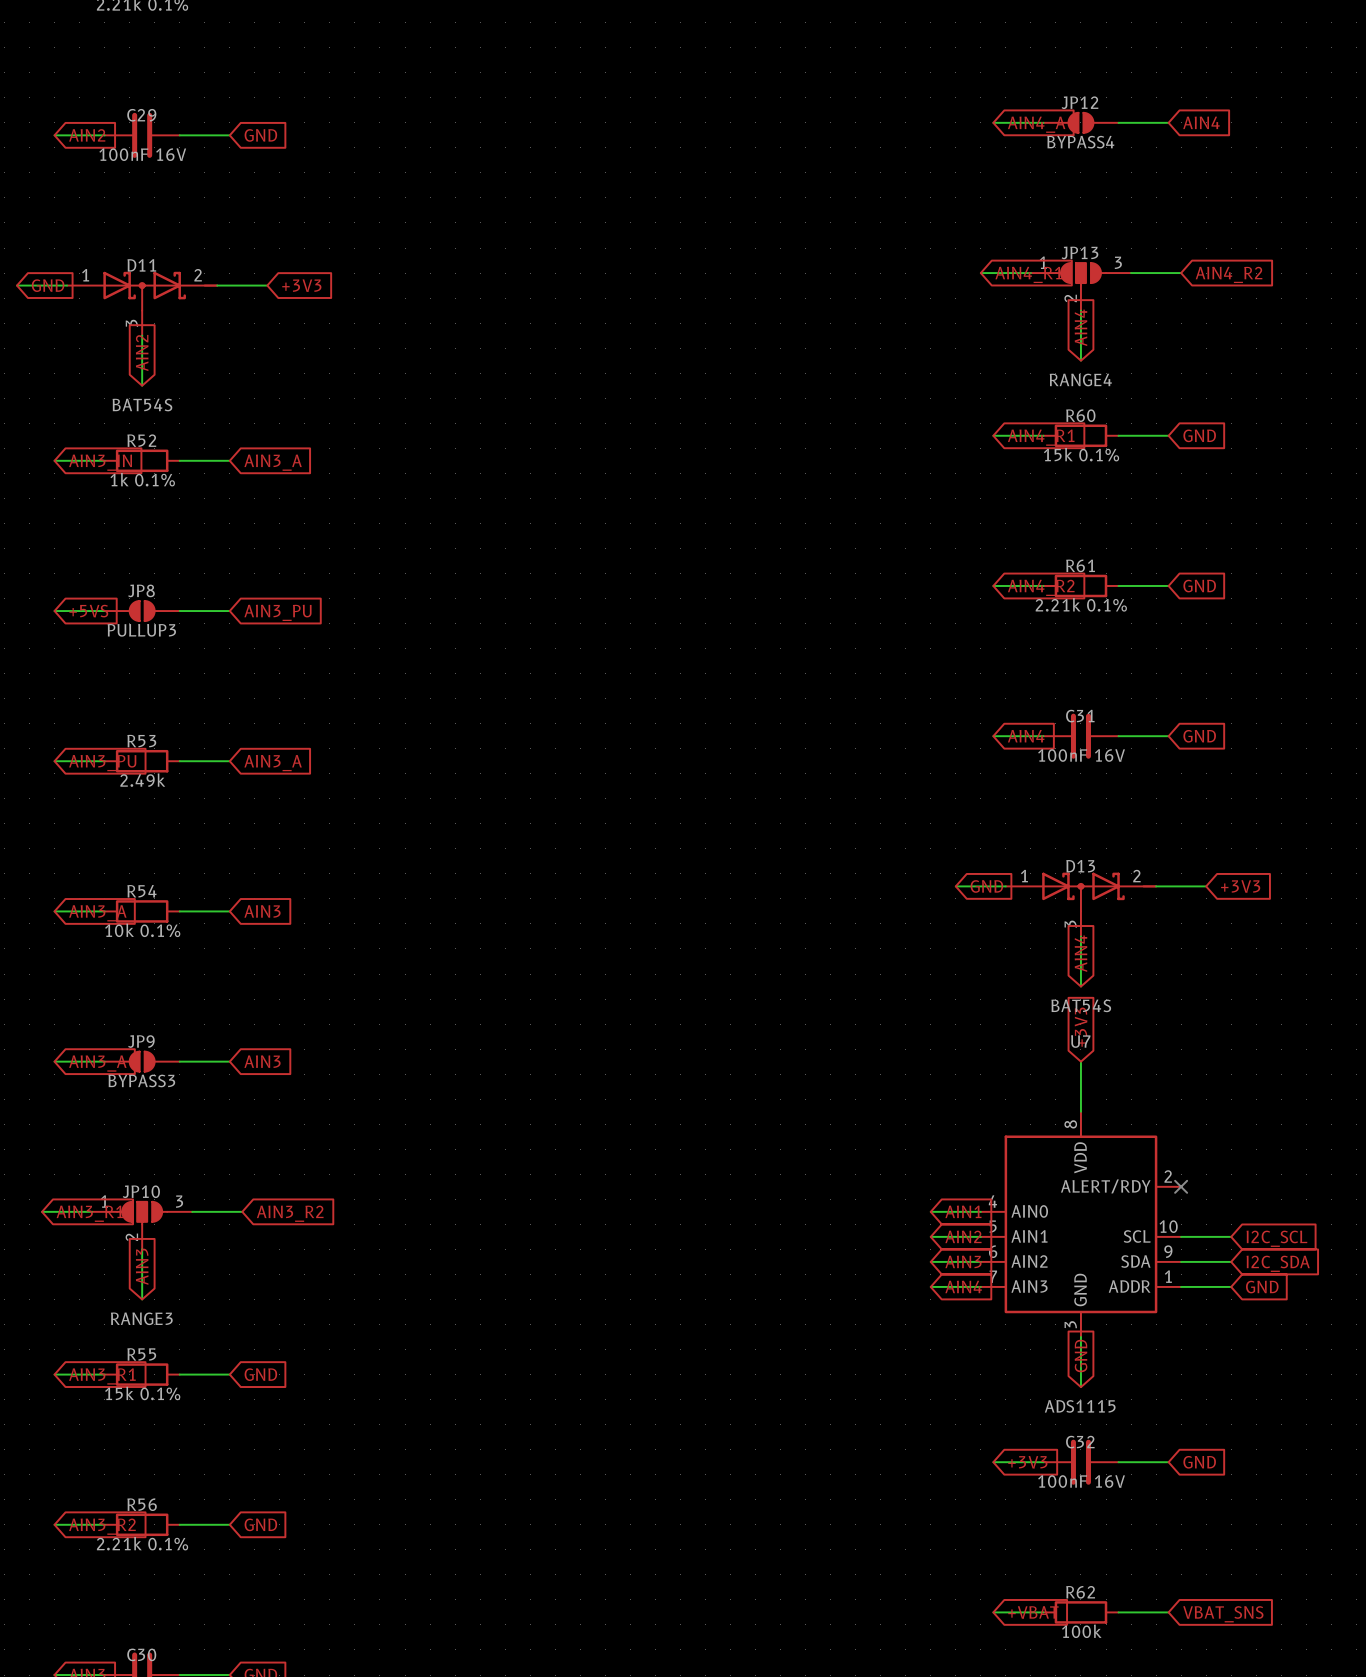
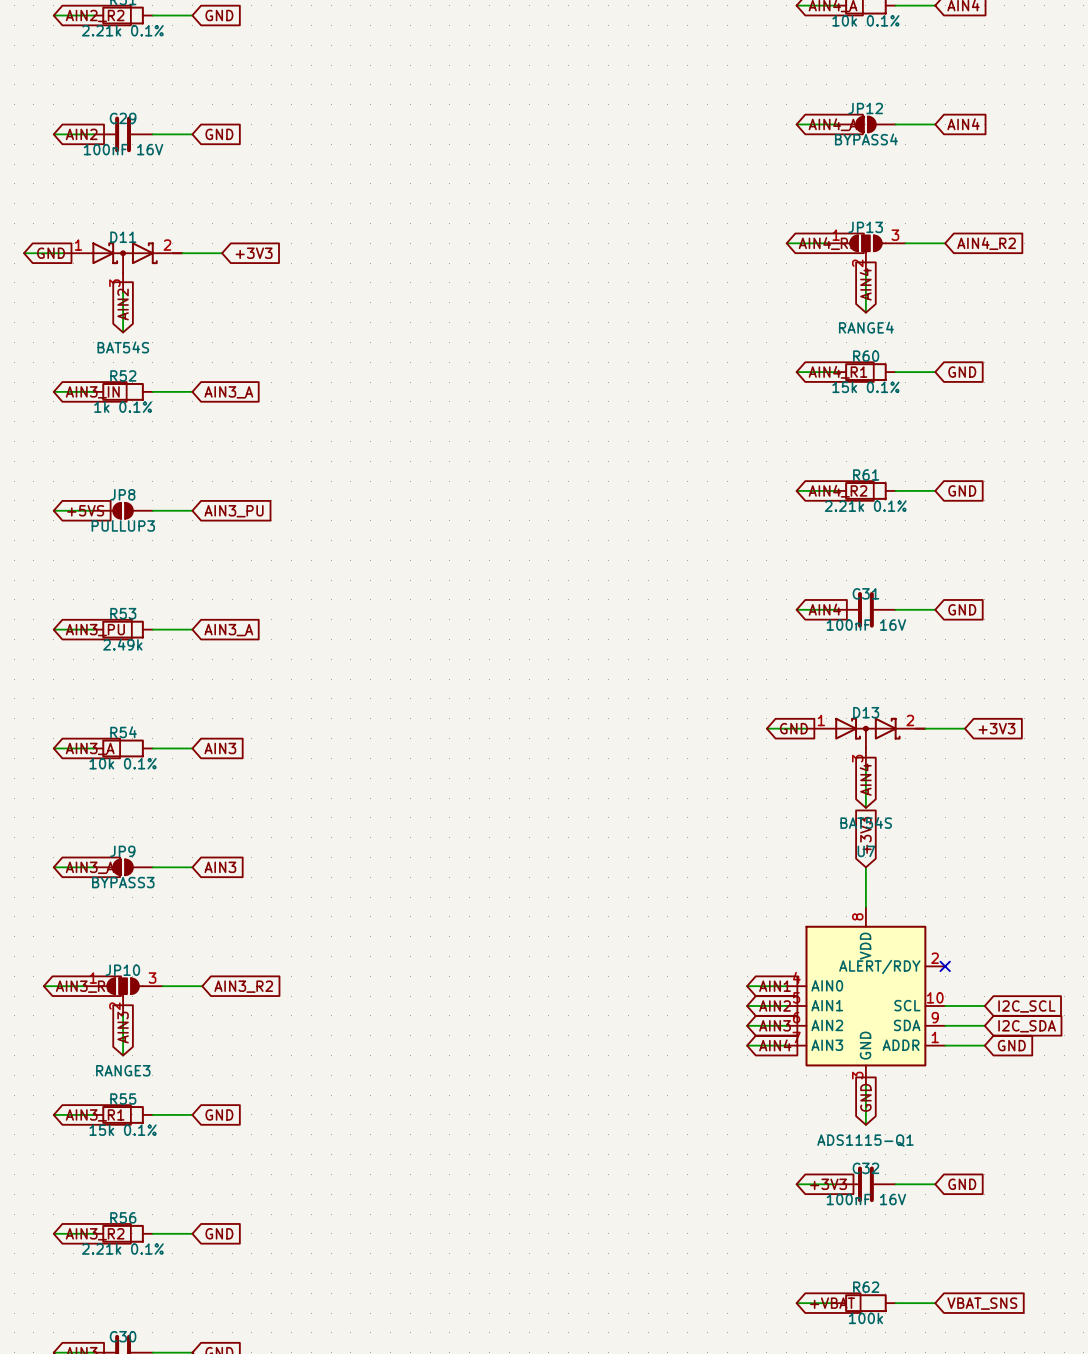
U7 value: ADS1115 (1080, 1406) -> ADS1115-Q1 (865, 1140)

